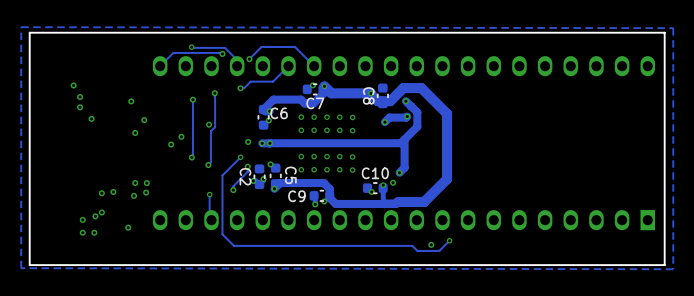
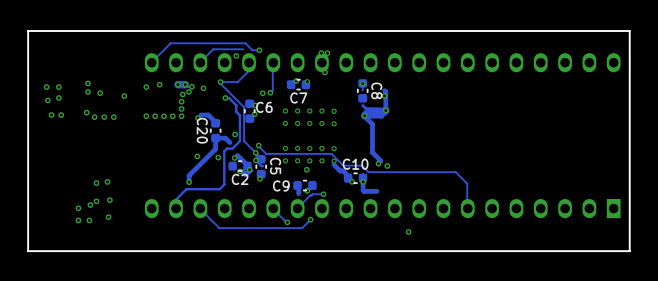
zone outline: (21, 27) (21, 268) (673, 269) (673, 28) (21, 27) -> none
track: (191, 47) (224, 47) (237, 60) (237, 66) -> none
via: (191, 47) -> none
track: none -> (243, 49) (213, 49) (199, 62)
track: (222, 53) (173, 52) (160, 66) -> none
via: (222, 53) -> none
track: none -> (259, 50) (252, 50) (245, 43) (170, 43) (151, 62)
via: none -> (259, 50)
via: none -> (321, 53)
via: none -> (327, 53)
track: (249, 59) (261, 47) (294, 47) (314, 66) -> none
track: none -> (248, 62) (248, 71) (237, 82) (220, 82) (220, 83) (244, 107) (244, 141) (255, 152)
track: none -> (272, 62) (272, 90) (270, 92)
track: (288, 66) (273, 81) (250, 81) (244, 88) (240, 88) -> none
via: none -> (325, 72)
via: (73, 85) -> none
via: none -> (220, 82)
via: none -> (88, 83)
via: (240, 88) -> none
track: none -> (362, 83) (362, 90)
via: none -> (159, 84)
track: none -> (177, 84) (191, 86)
via: none -> (177, 84)
via: none -> (185, 84)
via: none -> (46, 87)
via: none -> (58, 87)
via: none -> (146, 87)
via: none -> (191, 86)
track: (214, 93) (215, 127) (210, 131) (210, 162) (208, 165) -> none
track: (370, 93) (331, 93) (324, 86) (324, 92) (313, 103) (304, 103) (300, 99) (273, 99) (263, 109) (269, 111) -> none
track: (370, 93) (377, 101) (390, 101) (403, 88) (421, 88) (447, 113) (447, 179) (424, 202) (335, 203) (329, 197) (329, 188) (323, 183) (280, 183) (274, 188) -> none
via position: (371, 93) -> (362, 83)
C8 name position: C8 (368, 95) -> C8 (376, 90)
track: none -> (384, 90) (385, 111) (381, 116) (364, 116)
via: (80, 97) -> none
via: none -> (88, 91)
via: none -> (188, 91)
via: none -> (270, 92)
via: none -> (100, 93)
via: none -> (262, 93)
track: (192, 99) (191, 157) -> none
track: (405, 101) (417, 112) (417, 126) (400, 143) (269, 143) -> none
via: none -> (58, 98)
track: none -> (225, 98) (229, 98) (236, 105) (236, 111) (239, 115) (239, 141) (232, 148) (227, 148) (224, 151) (224, 184) (219, 189) (186, 189) (175, 200) (175, 208)
via: none -> (225, 98)
via: none -> (47, 100)
via: (80, 107) -> none
via: none -> (181, 101)
track: none -> (362, 105) (366, 108) (378, 108)
via: none -> (181, 108)
via: (144, 120) -> none
via: none -> (51, 115)
via: none -> (61, 115)
track: none -> (201, 115) (208, 115) (215, 123)
via: none -> (146, 116)
via: none -> (155, 116)
via: none -> (163, 116)
via: none -> (172, 116)
via: none -> (181, 116)
track: none -> (363, 115) (372, 124) (372, 152) (380, 160)
via: none -> (94, 117)
via: none -> (104, 117)
via: none -> (113, 117)
via: (135, 132) -> none
via: (181, 136) -> none
C20: none -> (215, 130)
track: (404, 139) (404, 167) (399, 172) -> none
via: (262, 143) -> none
track: (269, 143) (262, 143) -> none
via: (269, 143) -> none
via: (171, 144) -> none
track: none -> (229, 142) (225, 138) (215, 138) (215, 149) (189, 175) (189, 182)
track: none -> (258, 145) (266, 153) (331, 153) (343, 165) (362, 165) (368, 172) (455, 172) (467, 183) (467, 208)
via: none -> (258, 145)
via: (191, 157) -> none
track: (240, 157) (222, 175) (222, 234) (234, 245) (412, 245) (417, 250) (439, 250) (449, 240) -> none
via: (240, 157) -> none
via: none -> (255, 152)
track: none -> (237, 155) (252, 170)
via: (270, 164) -> none
via: none -> (218, 157)
track: (247, 166) (247, 171) (233, 186) (233, 190) -> none
track: none -> (255, 160) (263, 166)
via: none -> (255, 160)
track: none -> (334, 164) (340, 170) (343, 170) (348, 178)
via: none -> (387, 166)
C2 name position: C2 (245, 176) -> C2 (240, 179)
C2 rotation: 0° (259, 176) -> 90° clockwise (240, 166)
via: none -> (306, 169)
via: (393, 182) -> none
via: (135, 183) -> none
via: (146, 183) -> none
via: (383, 185) -> none
via: (233, 190) -> none
via: none -> (363, 181)
via: (146, 192) -> none
via: none -> (189, 182)
track: (209, 194) (209, 218) (211, 220) -> none
via: (209, 194) -> none
via: (134, 195) -> none
via: (315, 204) -> none
track: none -> (323, 194) (310, 195) (297, 208)
via: none -> (323, 194)
via: none -> (109, 200)
track: none -> (199, 208) (219, 228) (302, 228) (310, 219)
track: none -> (272, 208) (287, 222)
via: (128, 227) -> none
via: none -> (108, 217)
via: none -> (310, 219)
via: none -> (287, 222)
via: (449, 240) -> none

